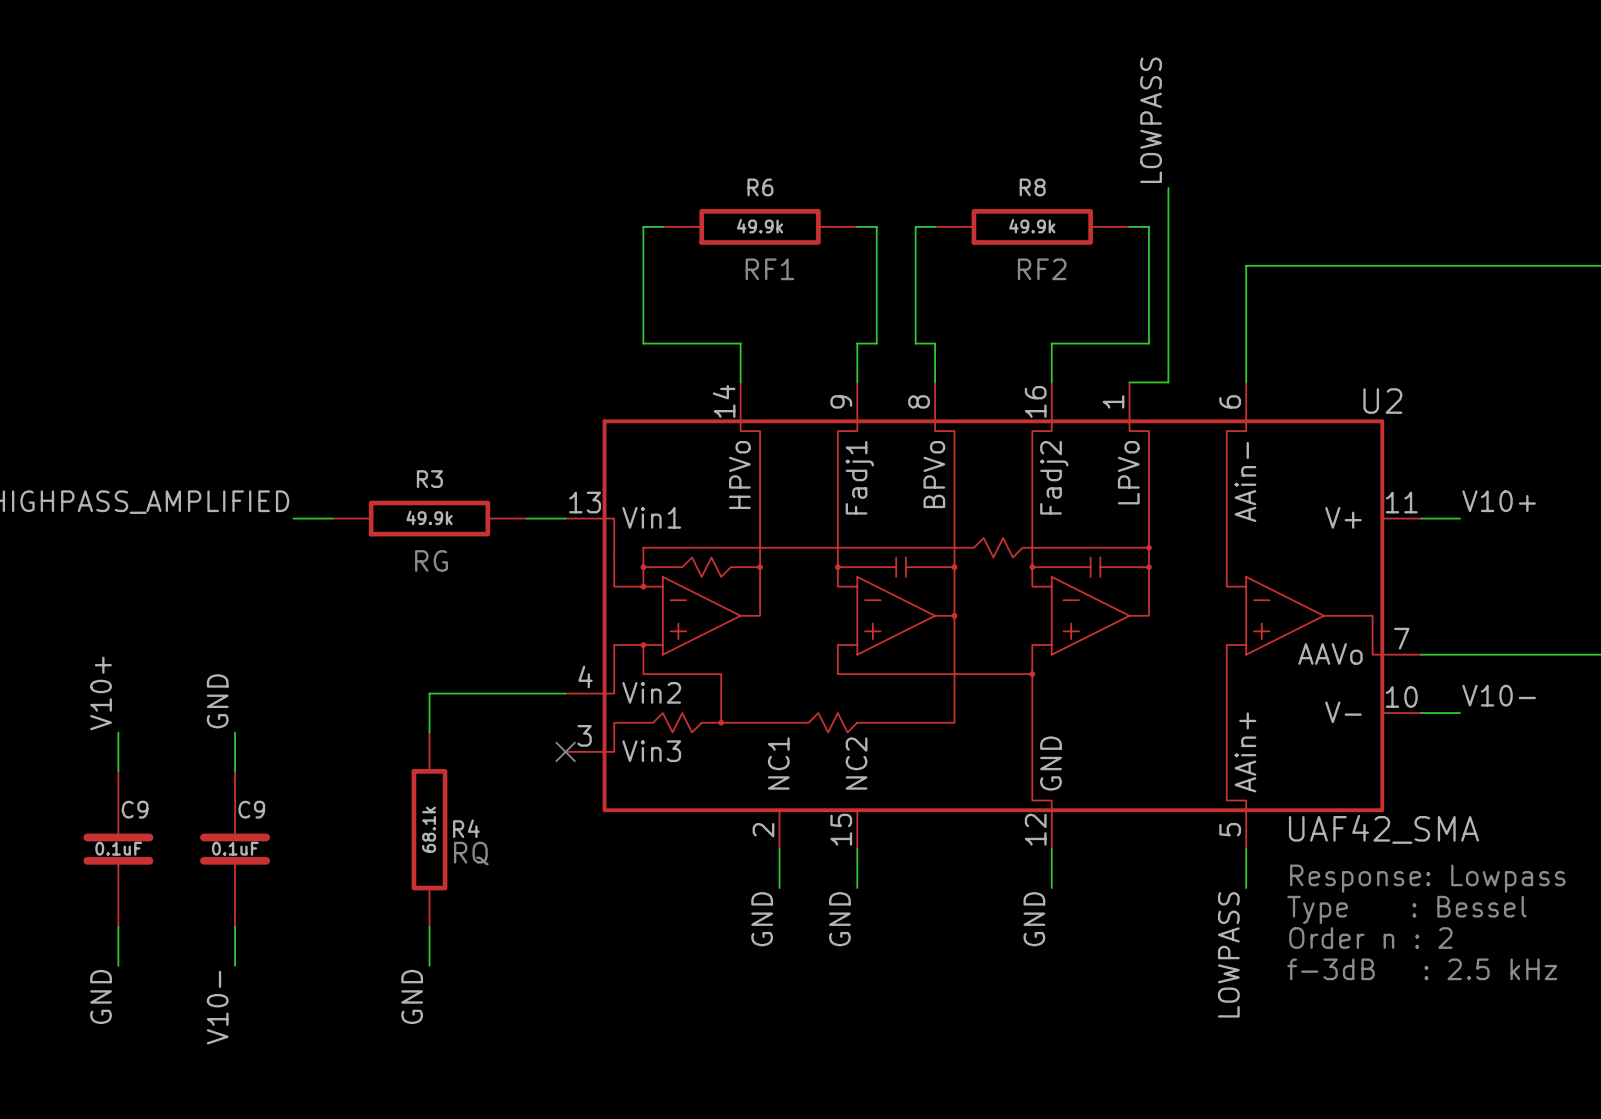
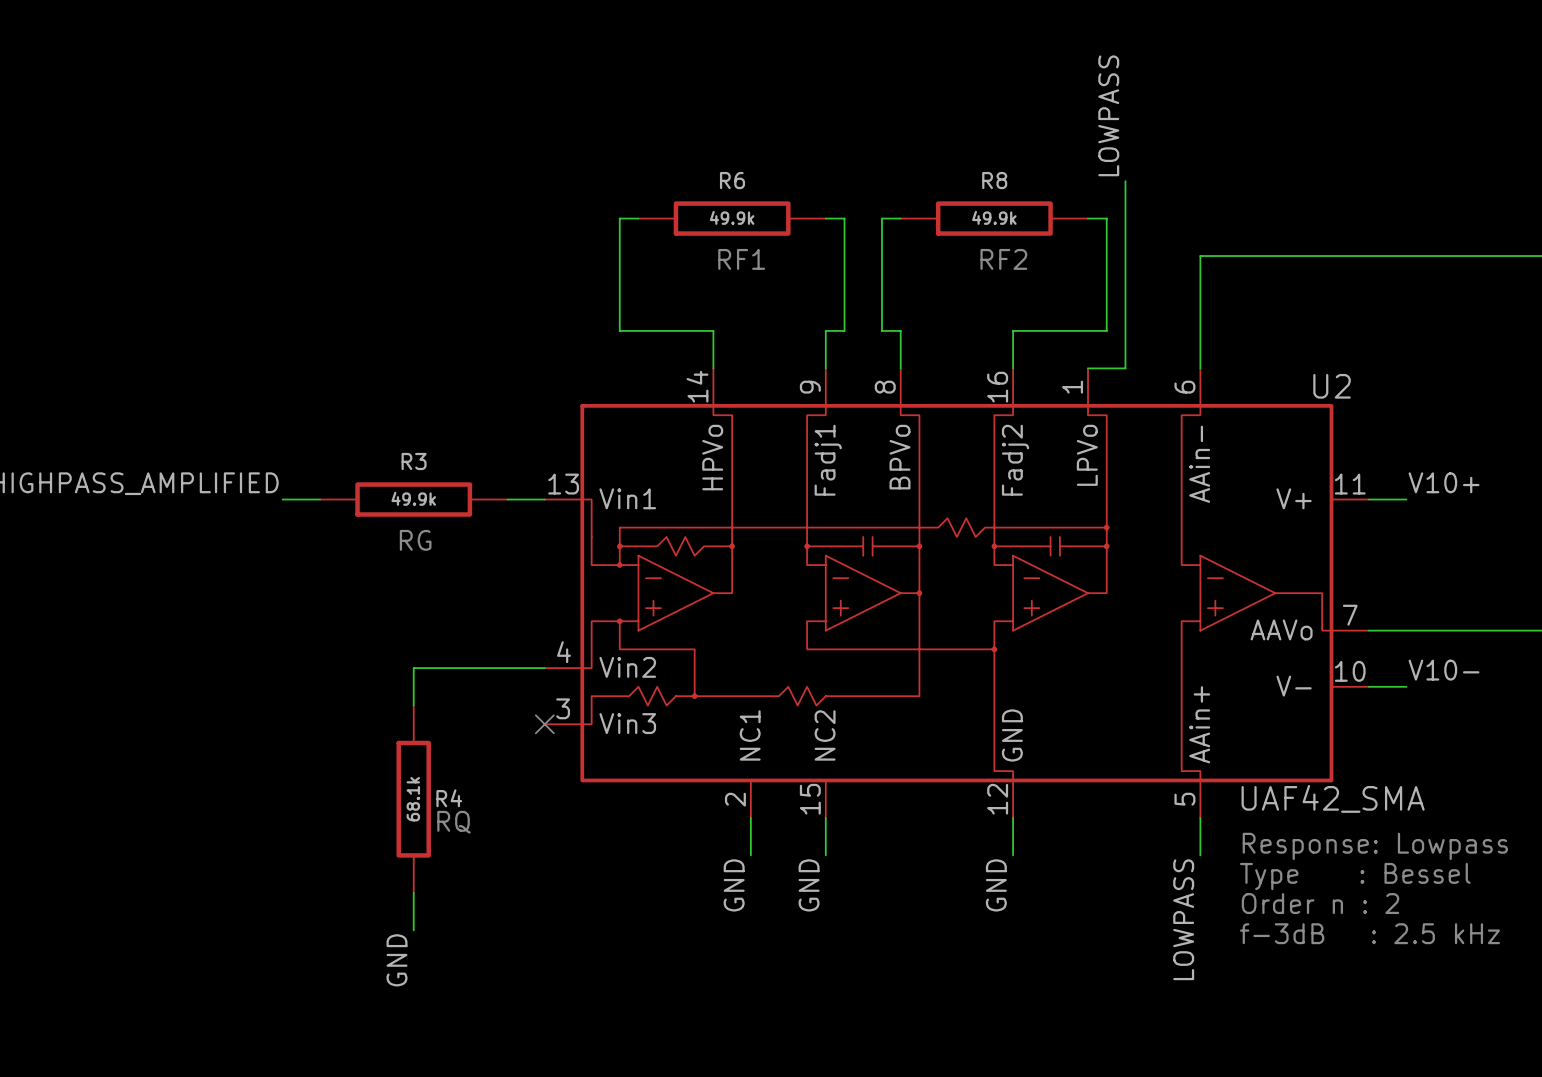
label: V10+ (101, 693) -> none
label: GND (217, 701) -> none
wire: (118, 732) (118, 771) -> none
wire: (235, 732) (235, 771) -> none
C9: 0.1uF (118, 849) -> none
C9: 0.1uF (235, 849) -> none
wire: (118, 926) (118, 965) -> none
wire: (235, 926) (235, 965) -> none
label: GND (101, 996) -> none
label: V10- (217, 1007) -> none

